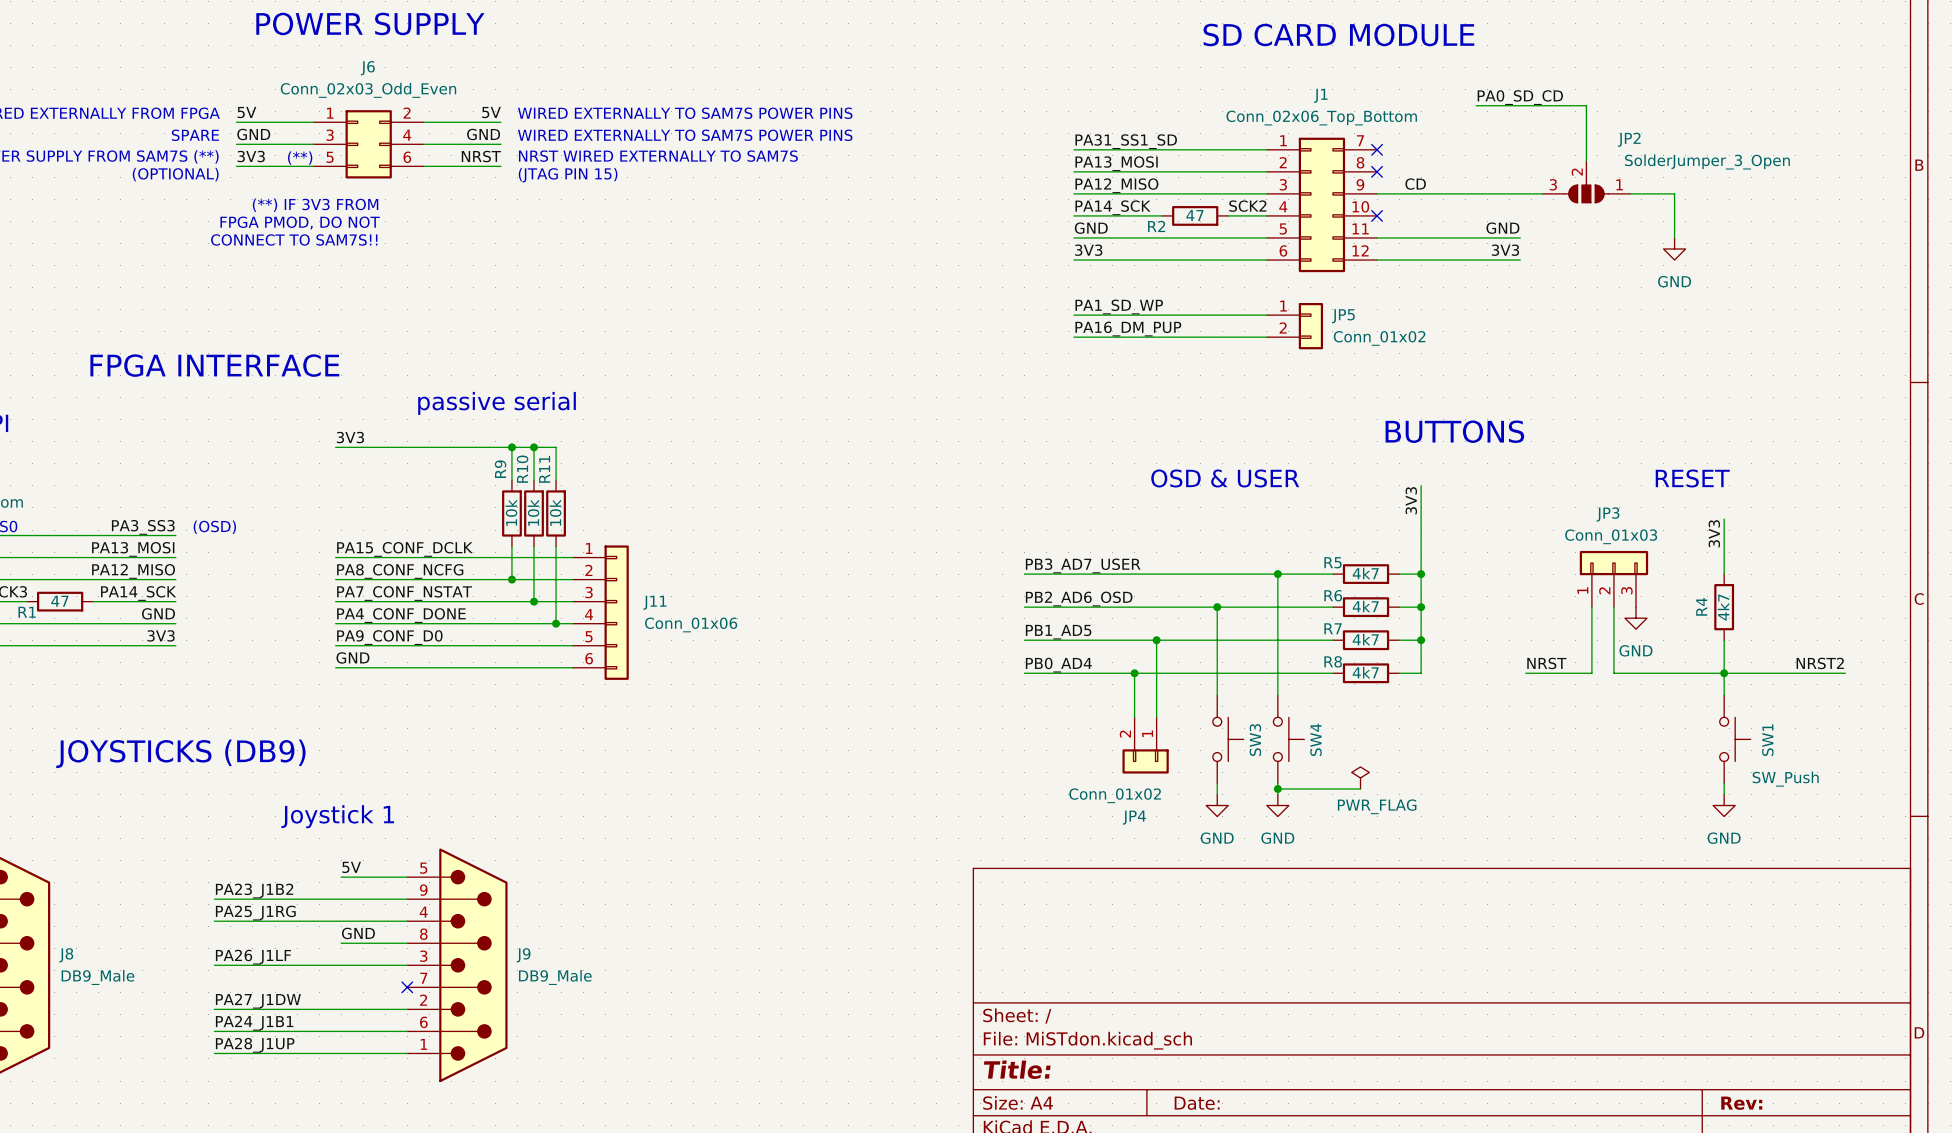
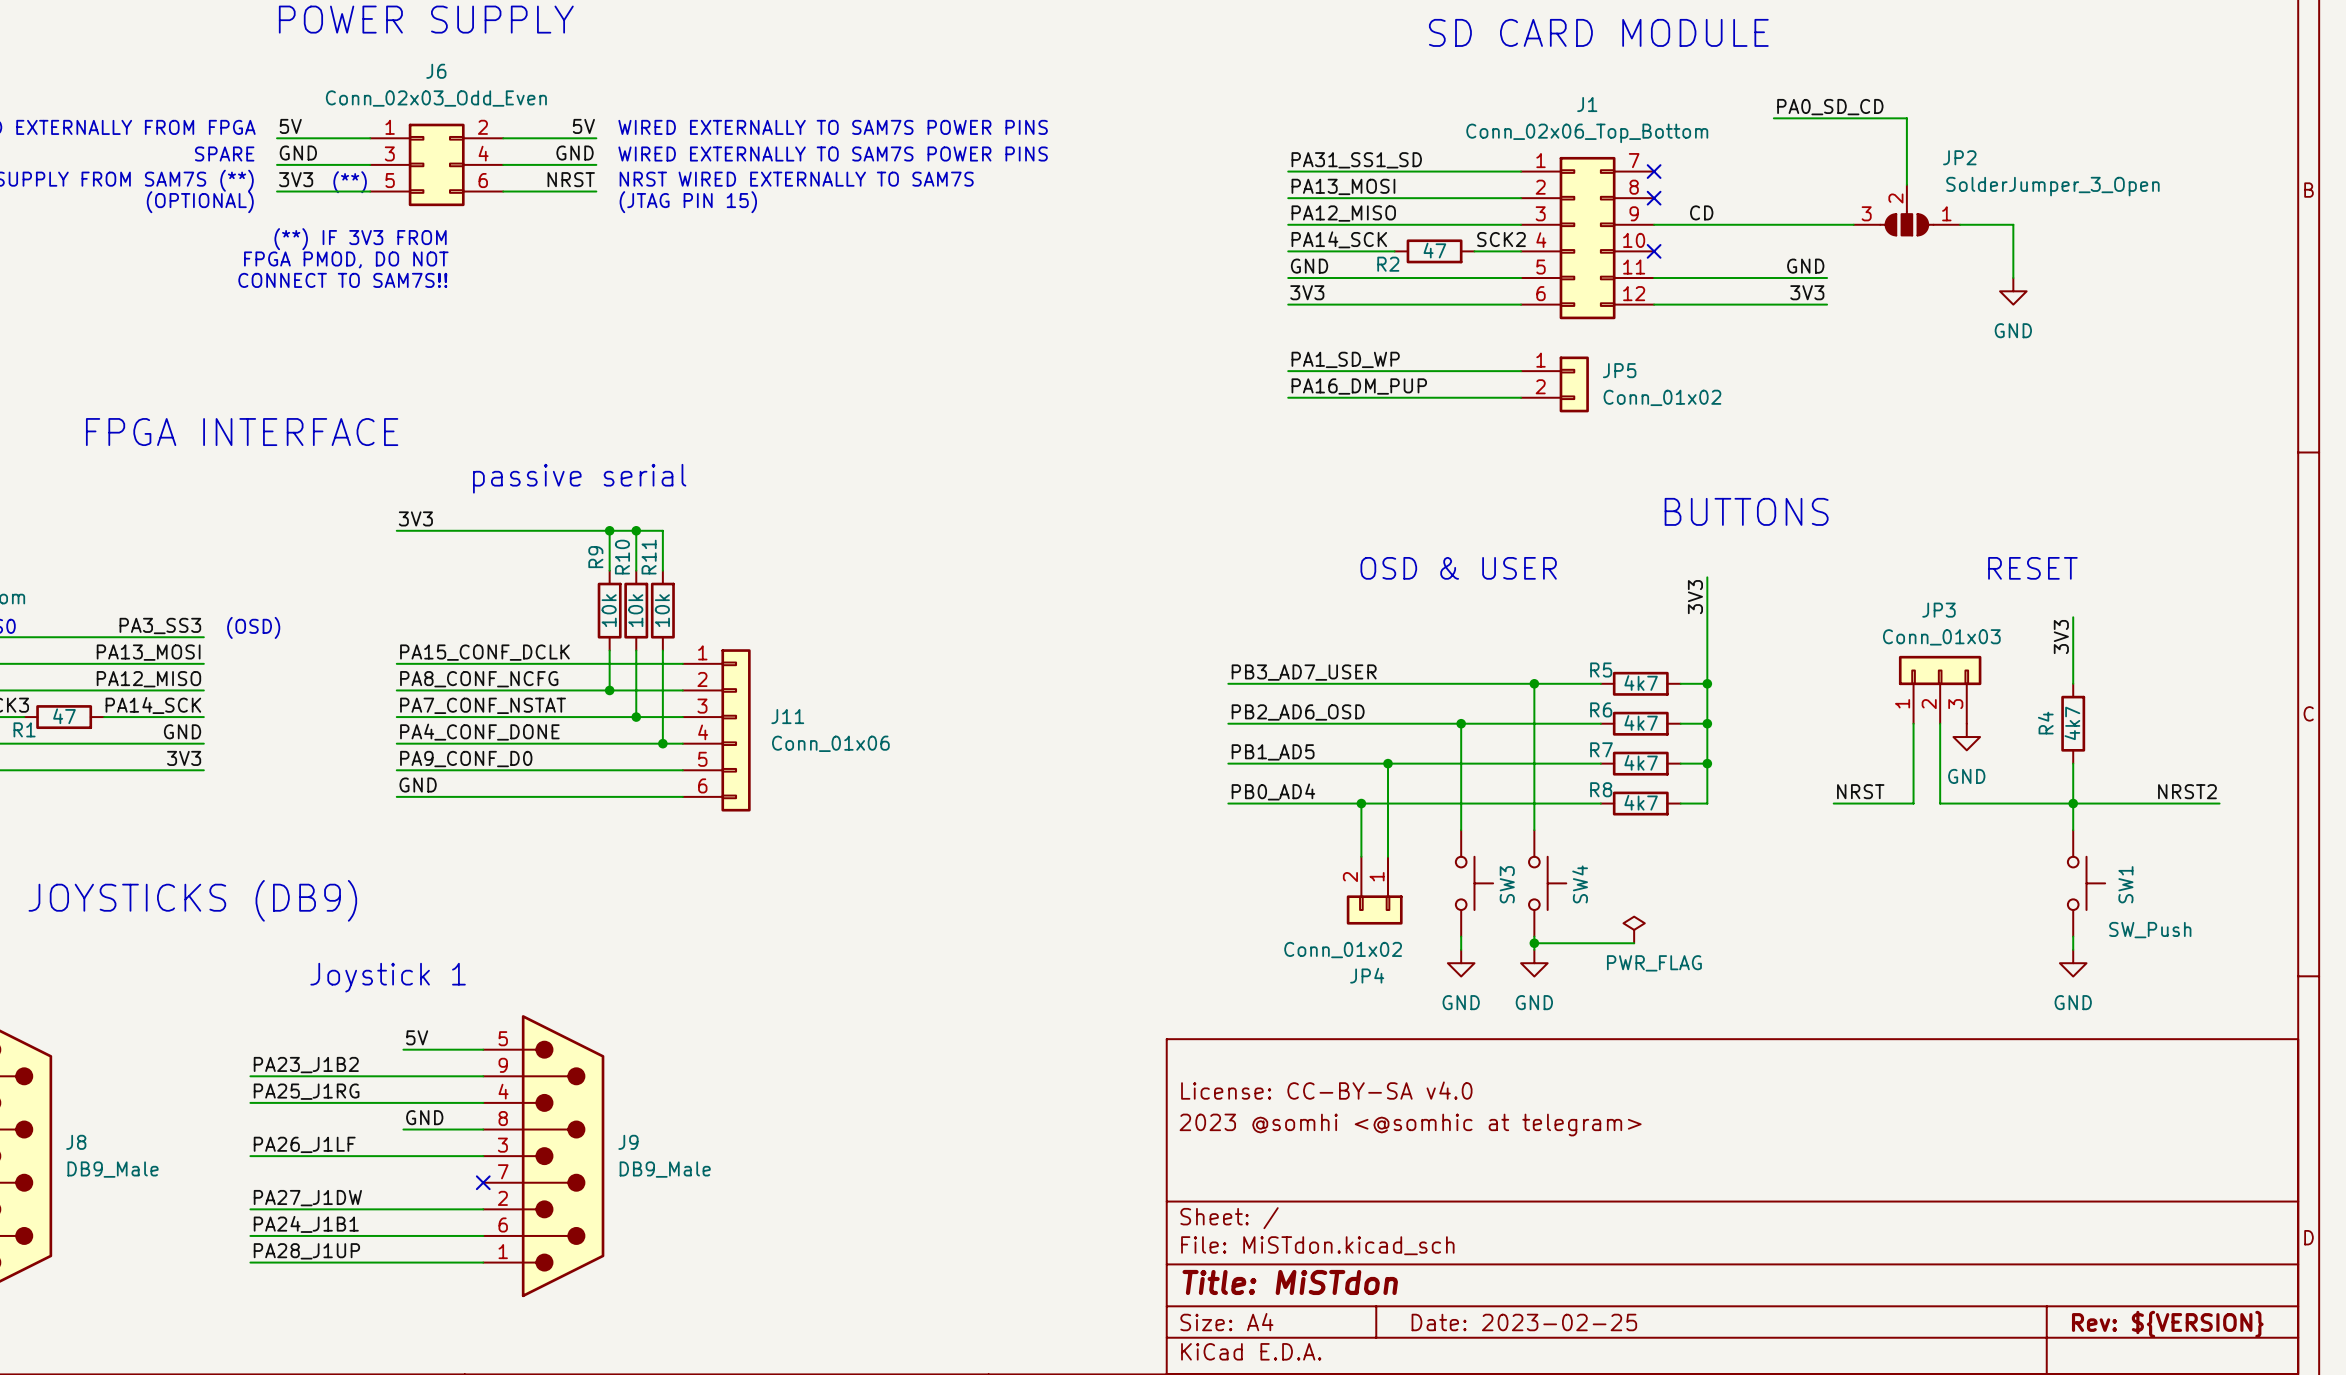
title block: none -> License: CC-BY-SA v4.0 (1326, 1090)
title block: none -> 2023 @somhi <@somhic at telegram> (1410, 1125)
title block: Title: (1017, 1069) -> Title: MiSTdon (1290, 1282)
title block: Date: (1197, 1103) -> Date: 2023-02-25 (1524, 1322)
title block: Rev: (1741, 1103) -> Rev: ${VERSION} (2167, 1324)

